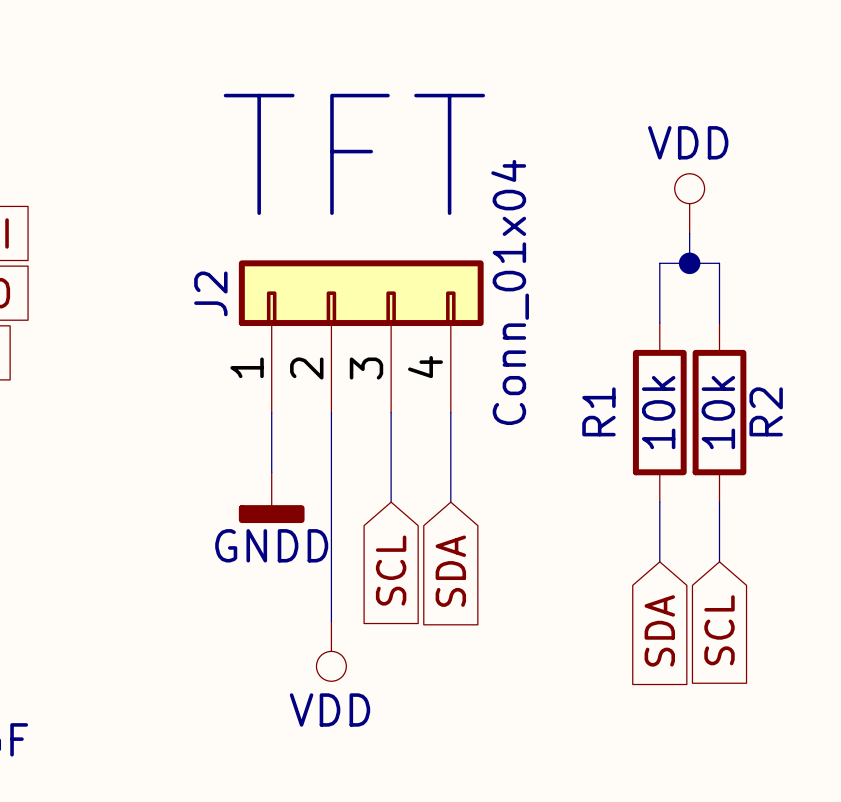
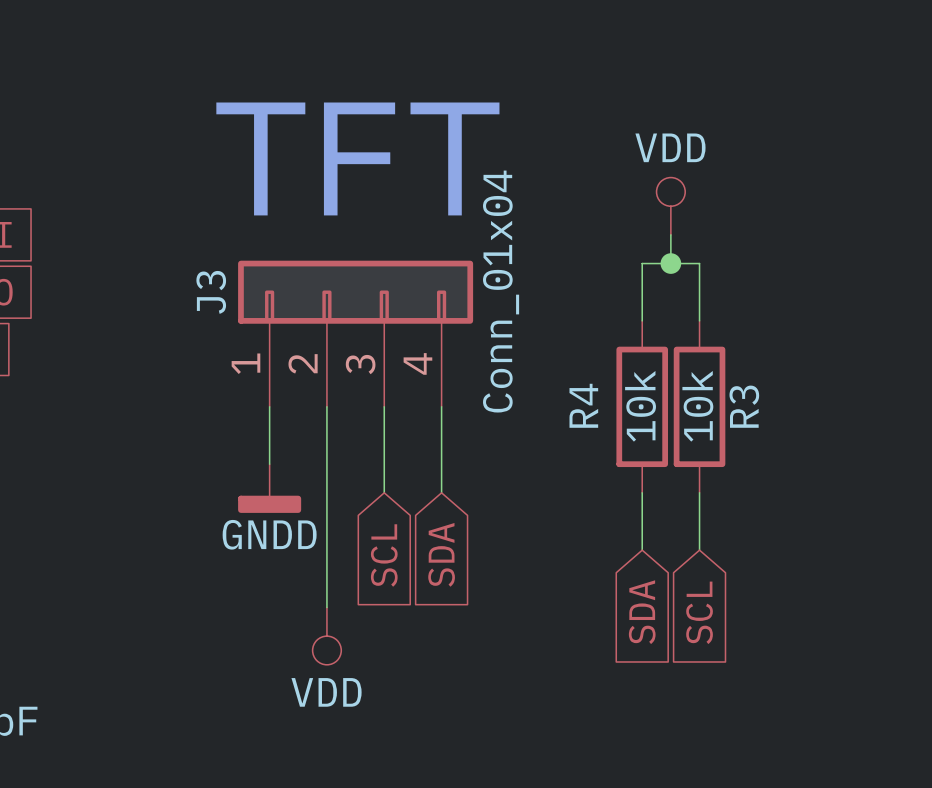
J2 name: J2 (210, 293) -> J3 (211, 292)
R1 name: R1 (598, 411) -> R4 (583, 405)
R2 name: R2 (766, 411) -> R3 (744, 406)

